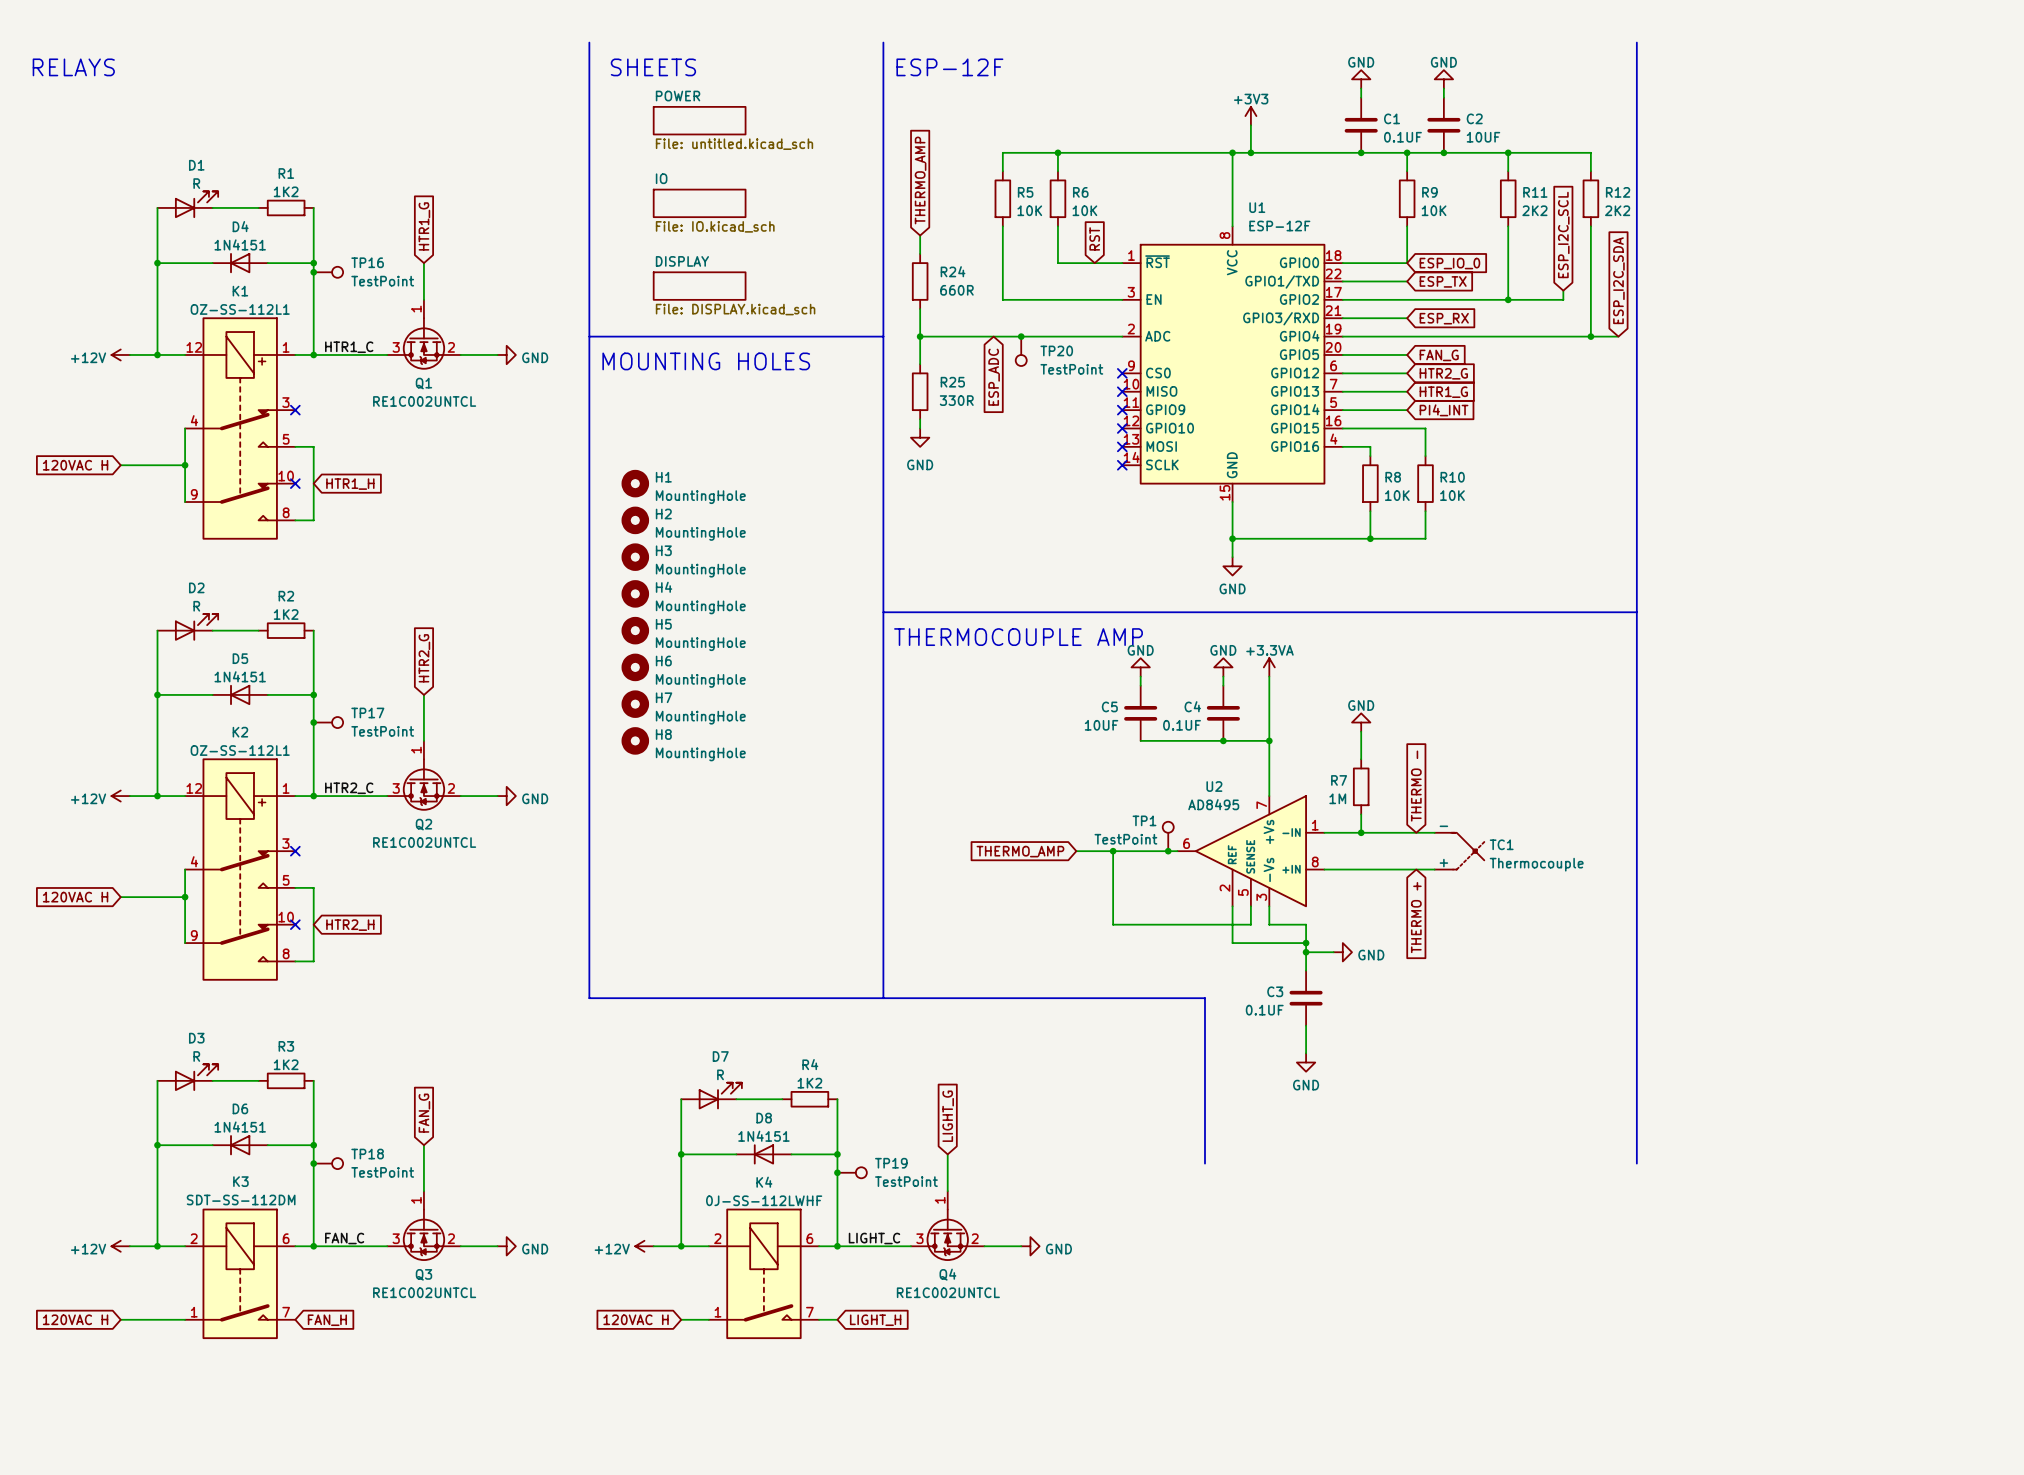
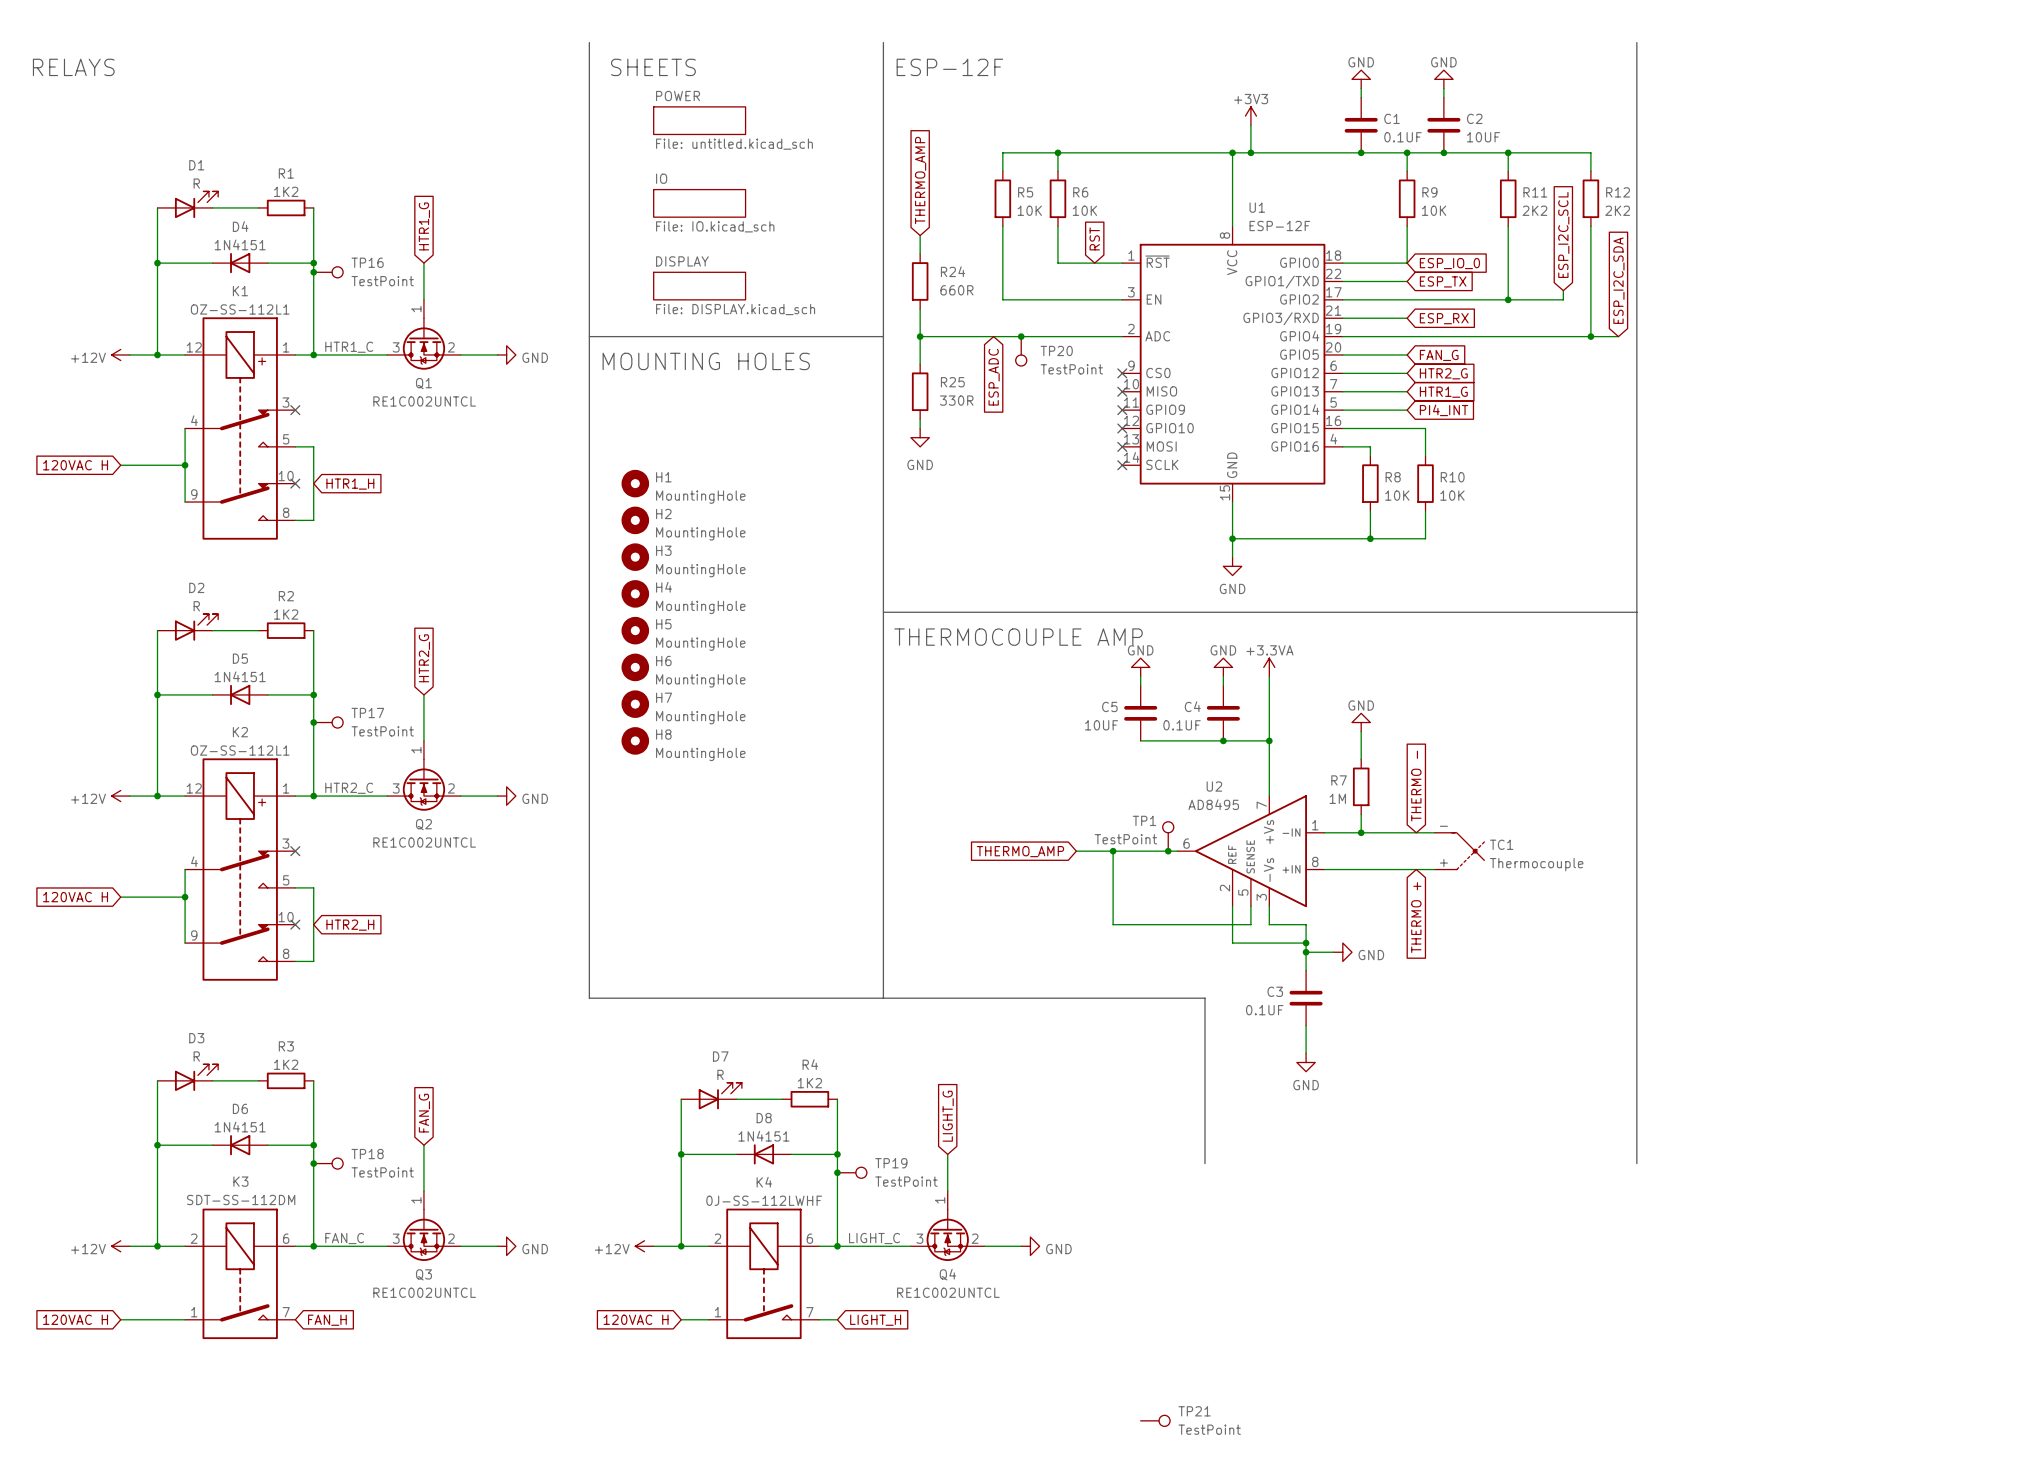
TP21: none -> TestPoint (1155, 1420)

